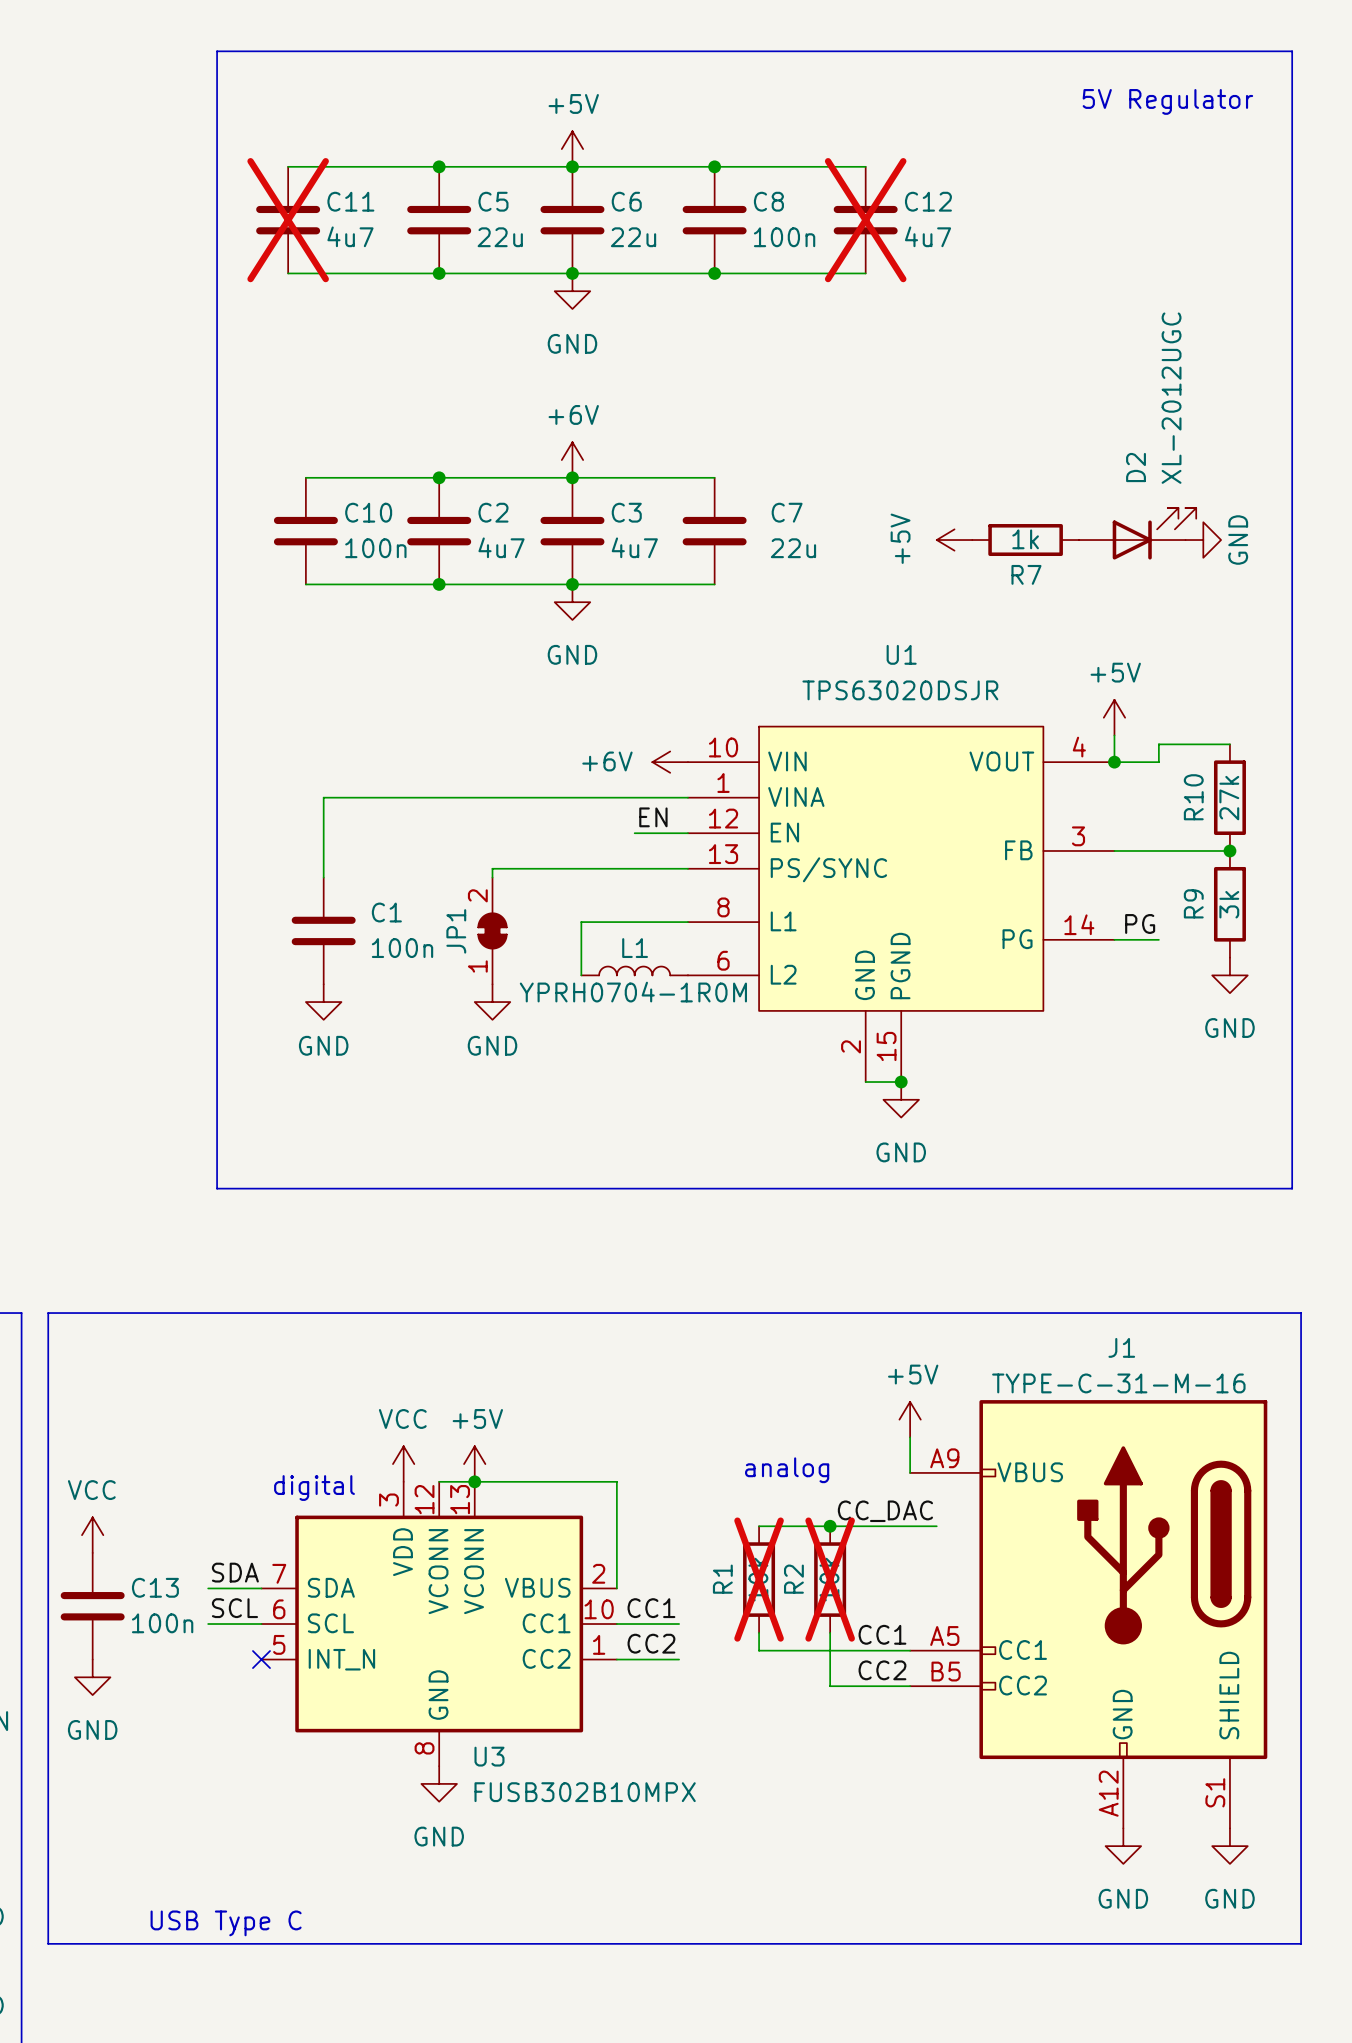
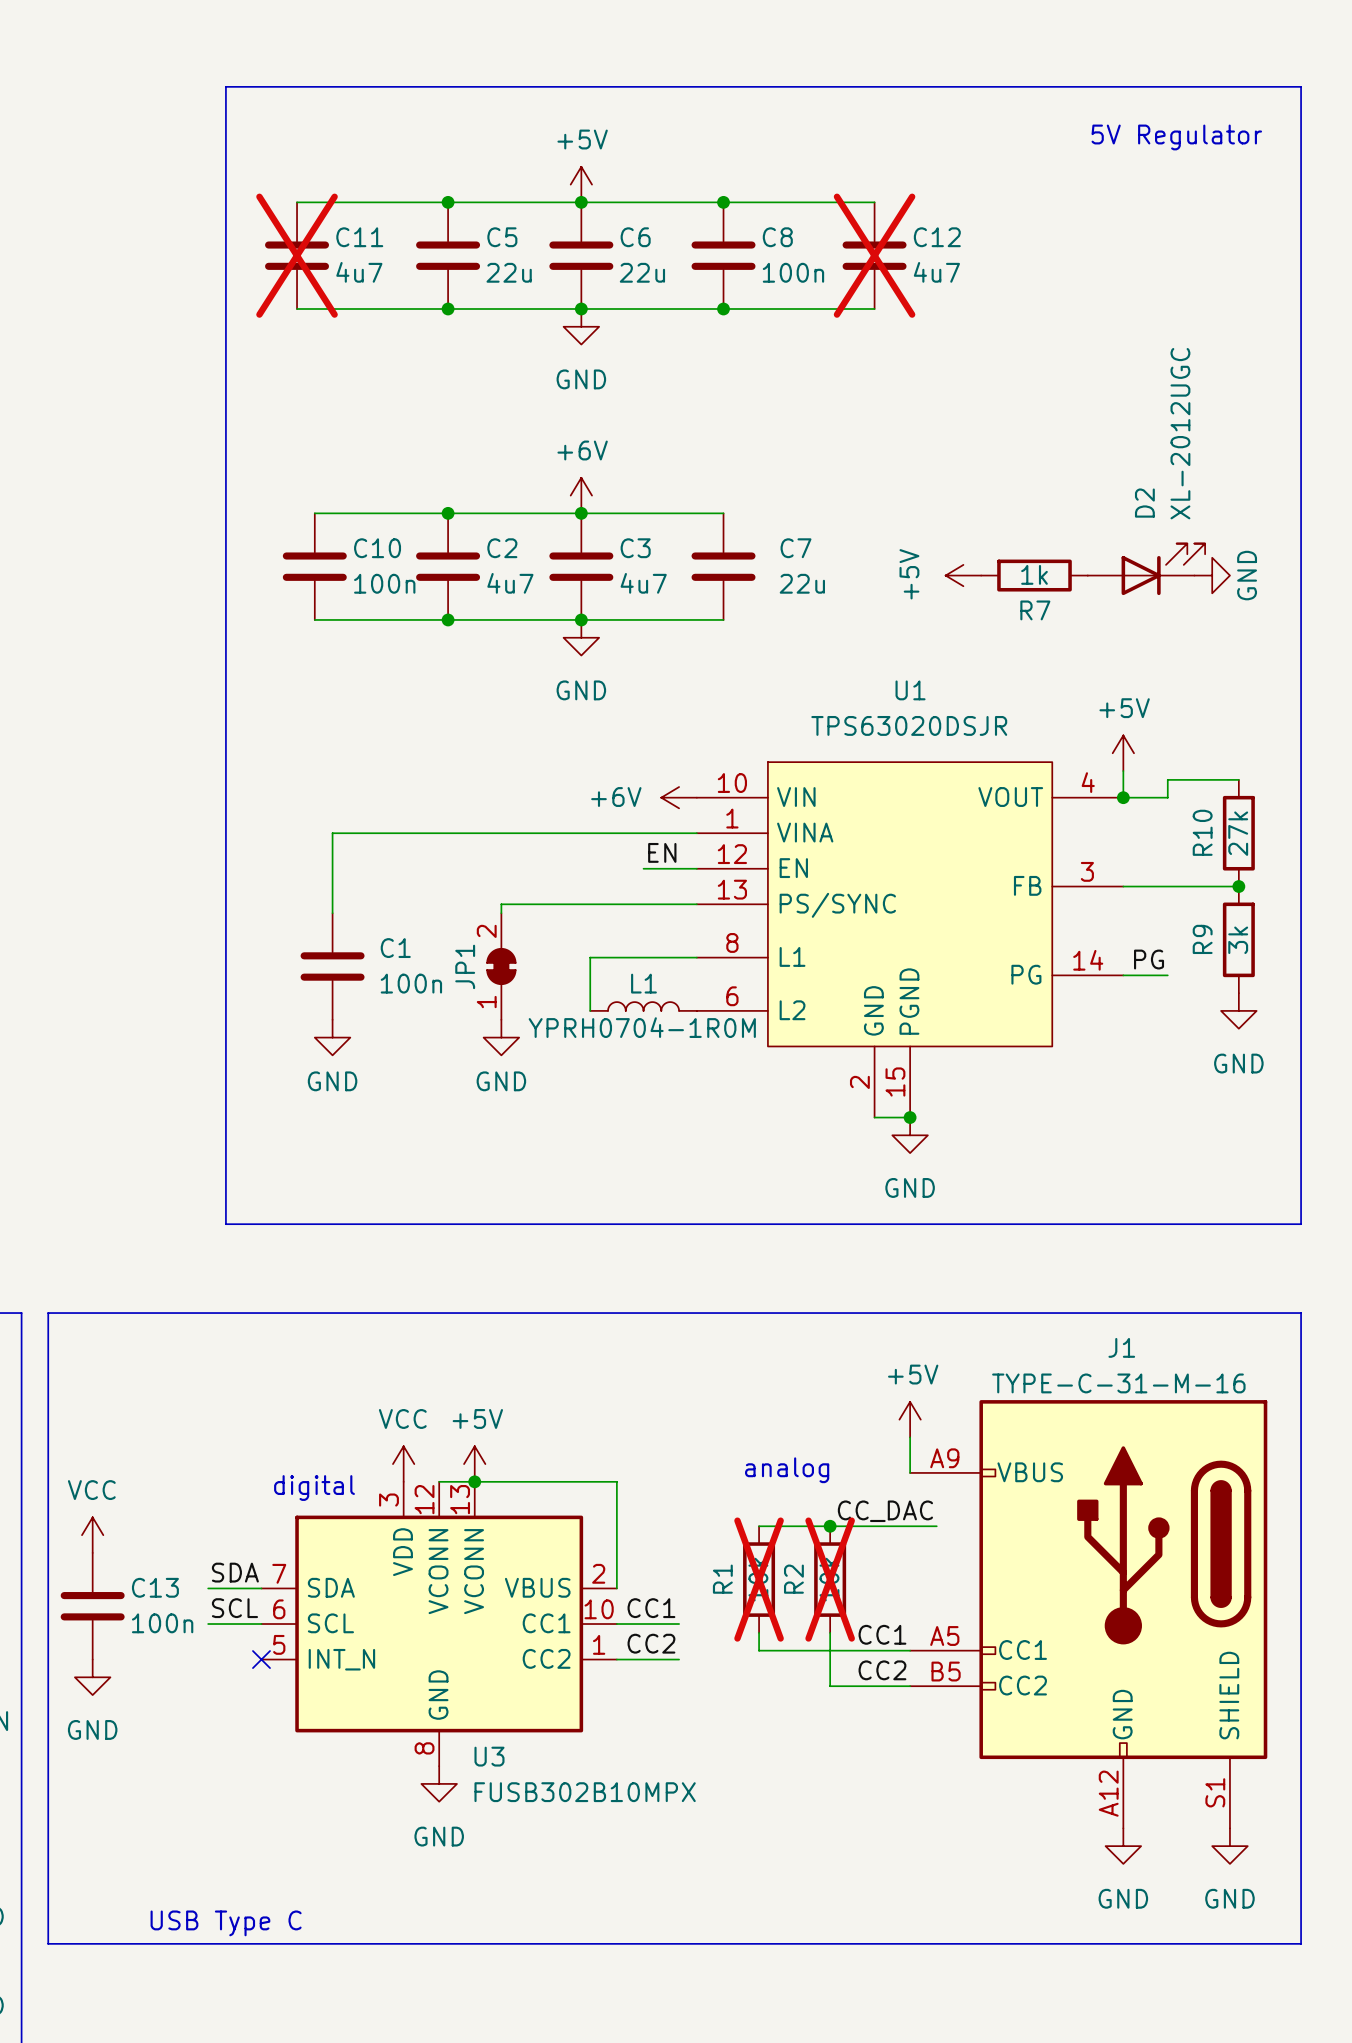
line: (217, 51) (1292, 51) (1292, 1188) (217, 1188) (217, 51) -> (225, 86) (1301, 86) (1301, 1224) (225, 1224) (225, 86)
text position: 5V Regulator (1167, 101) -> 5V Regulator (1176, 137)
power symbol position: +5V (572, 149) -> +5V (581, 184)
wire: (288, 166) (865, 166) -> (297, 202) (874, 202)
junction: (439, 166) -> none
junction: (572, 166) -> none
junction: (714, 166) -> none
junction: none -> (448, 202)
junction: none -> (581, 202)
junction: none -> (723, 202)
C11 position: (288, 220) -> (297, 255)
C5 position: (439, 220) -> (448, 255)
C6 position: (572, 220) -> (581, 255)
C8 position: (714, 220) -> (723, 255)
C12 position: (865, 220) -> (874, 255)
wire: (288, 273) (865, 273) -> (297, 308) (874, 308)
junction: (439, 273) -> none
junction: (572, 273) -> none
junction: (714, 273) -> none
power symbol position: GND (572, 291) -> GND (581, 326)
junction: none -> (448, 308)
junction: none -> (581, 308)
junction: none -> (723, 308)
power symbol position: +6V (572, 460) -> +6V (581, 495)
wire: (305, 477) (714, 477) -> (314, 513) (723, 513)
junction: (439, 477) -> none
junction: (572, 477) -> none
junction: none -> (448, 513)
junction: none -> (581, 513)
C10 position: (305, 531) -> (314, 566)
C2 position: (439, 531) -> (448, 566)
C3 position: (572, 531) -> (581, 566)
C7 position: (714, 531) -> (723, 566)
D2 position: (1137, 533) -> (1146, 569)
power symbol position: +5V (954, 540) -> +5V (963, 575)
R7 position: (1025, 540) -> (1034, 575)
power symbol position: GND (1203, 540) -> GND (1212, 575)
wire: (305, 584) (714, 584) -> (314, 619) (723, 619)
junction: (439, 584) -> none
junction: (572, 584) -> none
power symbol position: GND (572, 602) -> GND (581, 637)
junction: none -> (448, 619)
junction: none -> (581, 619)
power symbol position: +5V (1114, 717) -> +5V (1123, 753)
wire: (1114, 735) (1114, 762) (1158, 762) (1158, 744) (1229, 744) -> (1123, 771) (1123, 797) (1167, 797) (1167, 779) (1238, 779)
power symbol position: +6V (670, 762) -> +6V (679, 797)
junction position: (1114, 762) -> (1123, 797)
wire: (687, 797) (323, 797) (323, 877) -> none
R10 position: (1229, 797) -> (1238, 833)
label position: EN (653, 817) -> EN (662, 852)
wire: none -> (634, 833) (332, 833) (332, 913)
wire: (1114, 850) (1229, 850) -> (1123, 886) (1238, 886)
junction position: (1229, 850) -> (1238, 886)
wire: (643, 868) (492, 868) (492, 877) -> none
wire: none -> (696, 904) (501, 904) (501, 913)
U1 position: (901, 904) -> (910, 939)
R9 position: (1229, 904) -> (1238, 939)
wire: (687, 922) (581, 922) (581, 975) -> (696, 957) (590, 957) (590, 1010)
label position: PG (1140, 923) -> PG (1149, 959)
C1 position: (323, 930) -> (332, 966)
JP1 position: (492, 930) -> (501, 966)
wire: (1114, 939) (1158, 939) -> (1123, 975) (1167, 975)
L1 position: (634, 970) -> (643, 1006)
power symbol position: GND (1229, 975) -> GND (1238, 1010)
power symbol position: GND (323, 1002) -> GND (332, 1037)
power symbol position: GND (492, 1002) -> GND (501, 1037)
wire: (865, 1082) (901, 1082) -> (874, 1117) (910, 1117)
junction position: (901, 1082) -> (910, 1117)
power symbol position: GND (901, 1099) -> GND (910, 1135)

